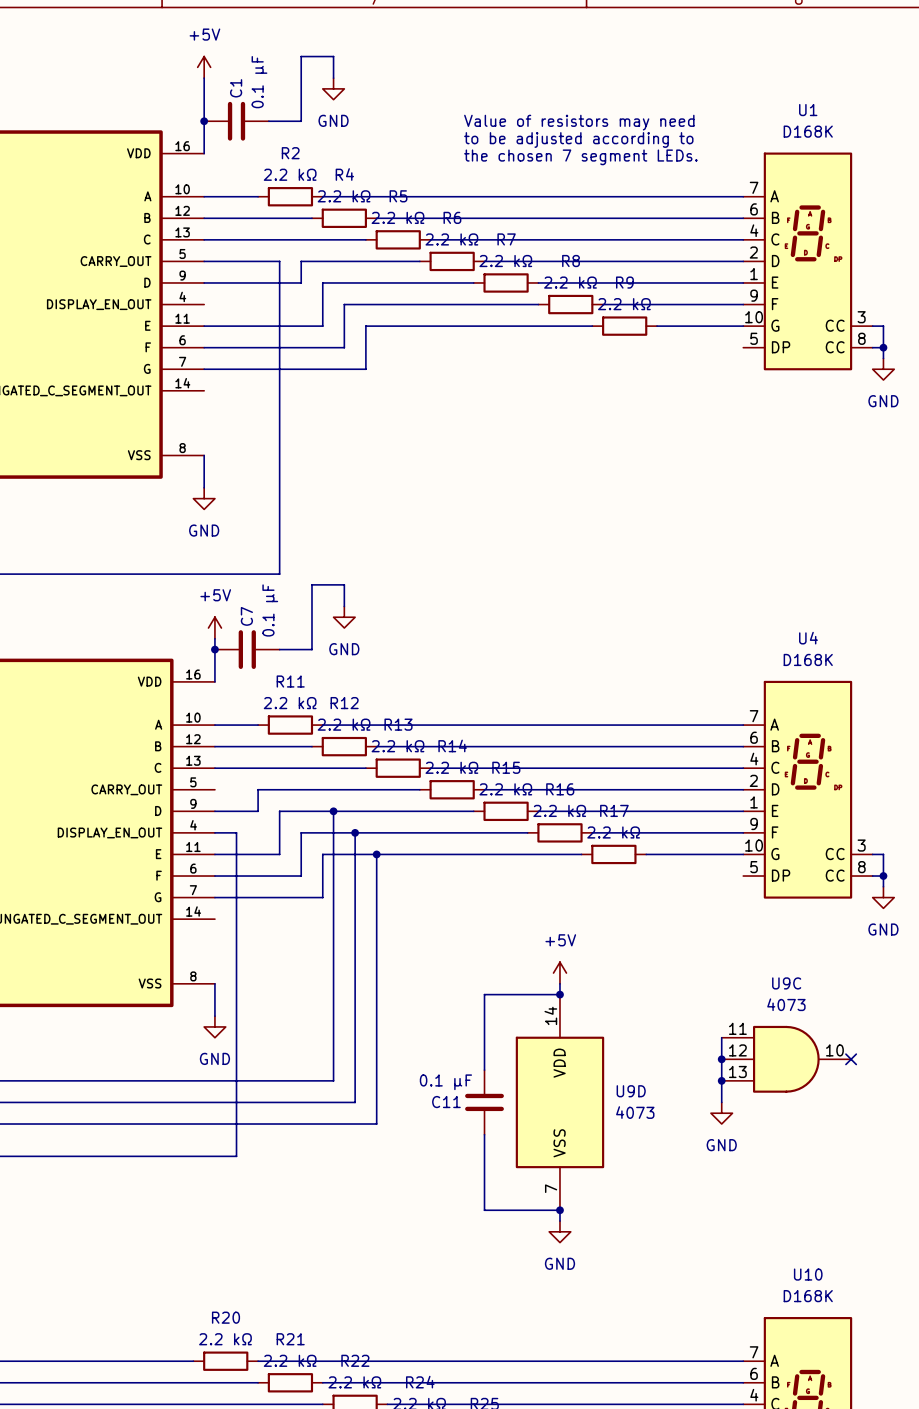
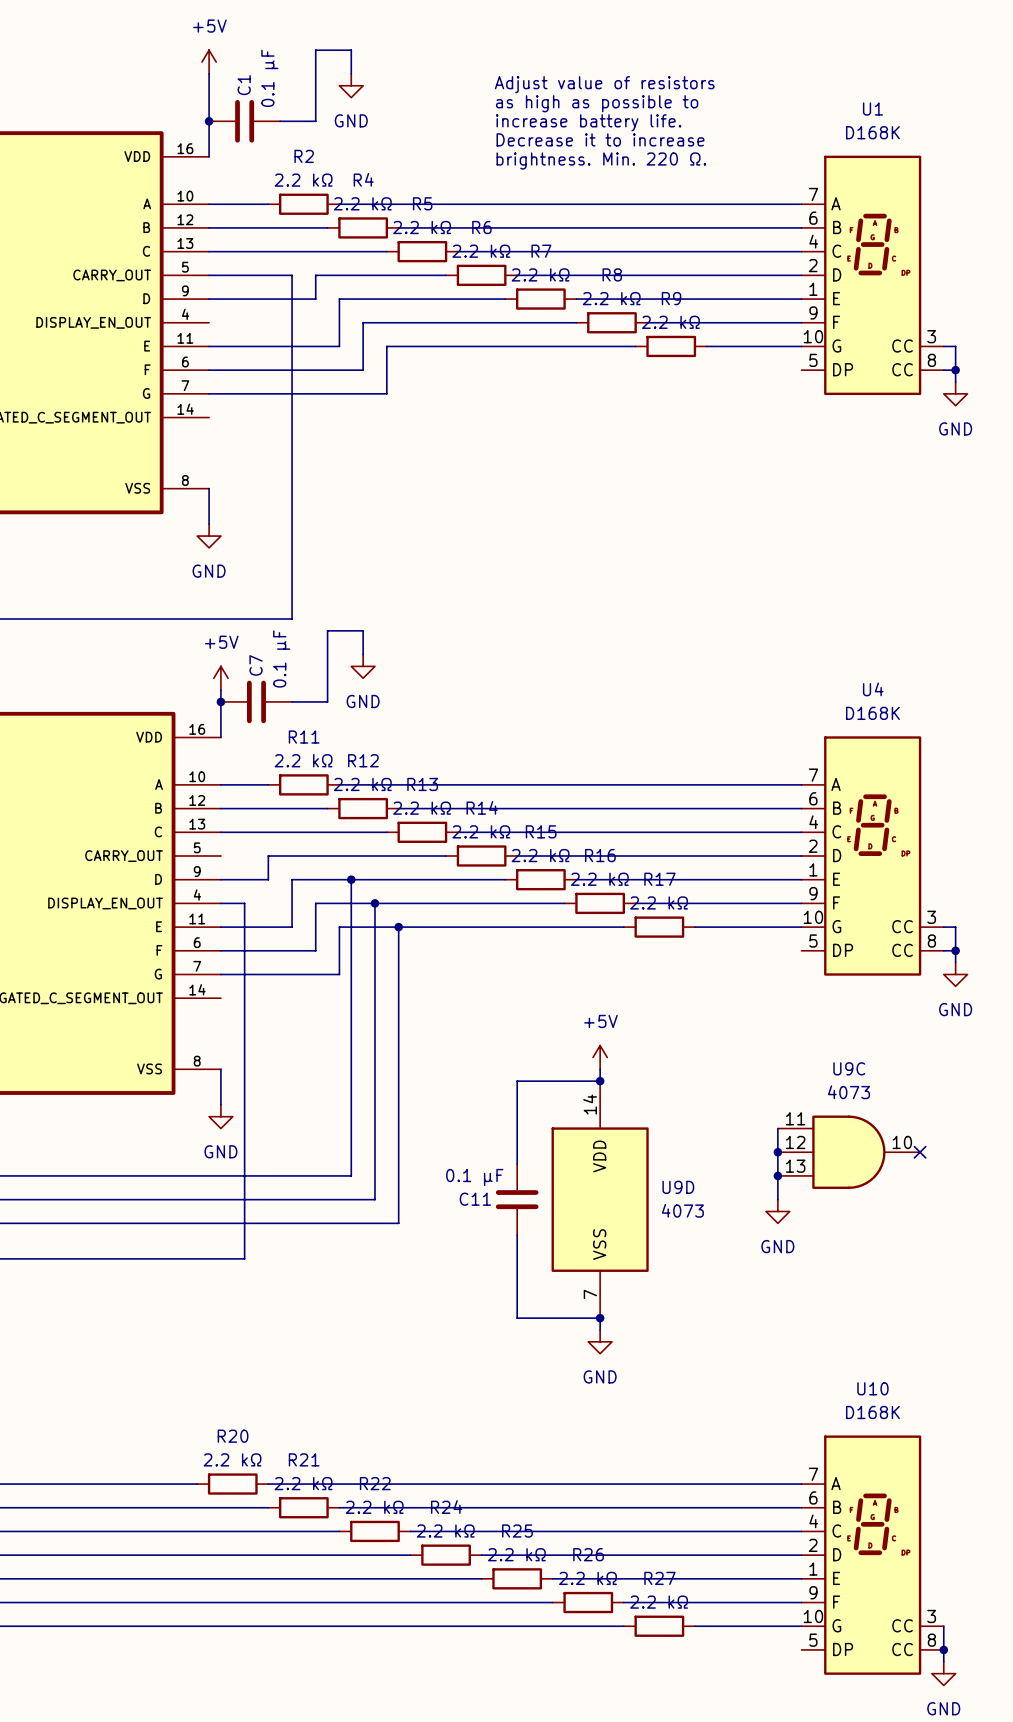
text: none -> Adjust value of resistors (604, 84)
text: none -> as high as possible to (597, 103)
text: Value of resistors may need (579, 122) -> increase battery life. (588, 122)
text: to be adjusted according to (578, 139) -> Decrease it to increase (600, 139)
text: the chosen 7 segment LEDs. (580, 157) -> brightness. Min. 220 Ω. (601, 160)

